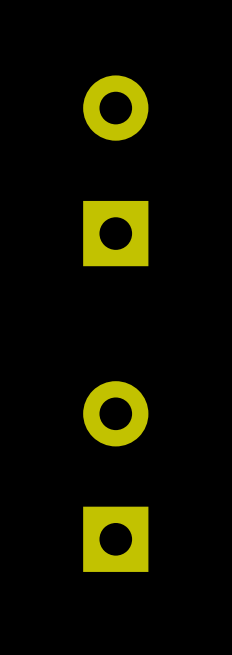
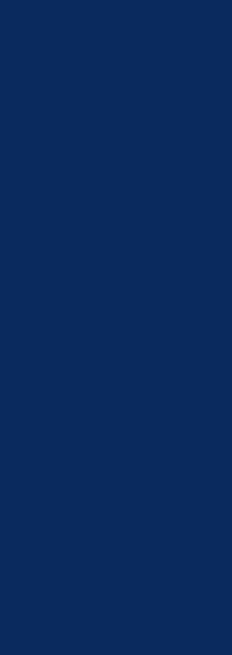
part: (115, 170) -> none
part: (115, 476) -> none

